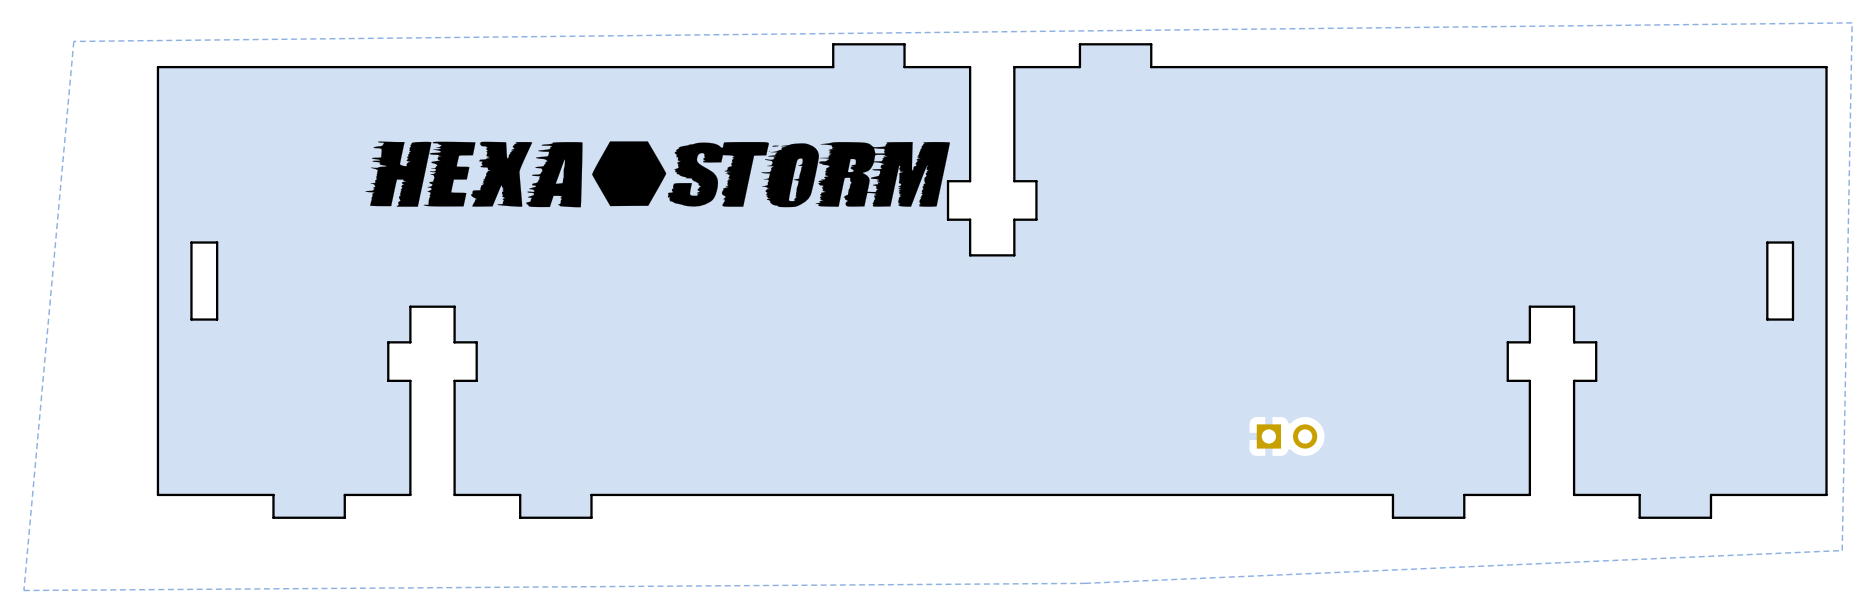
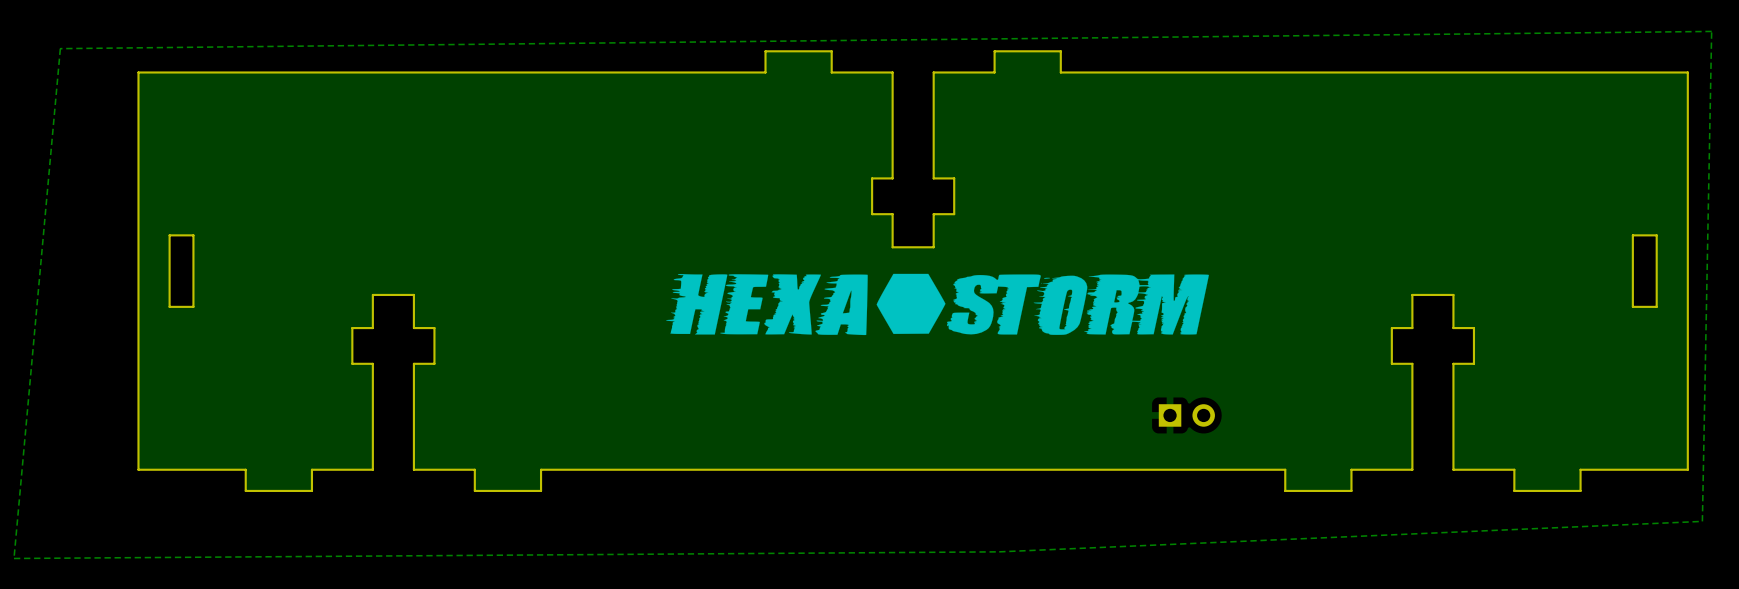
drawing: [365, 141, 950, 208] -> none
drawing: none -> [666, 273, 1209, 336]

